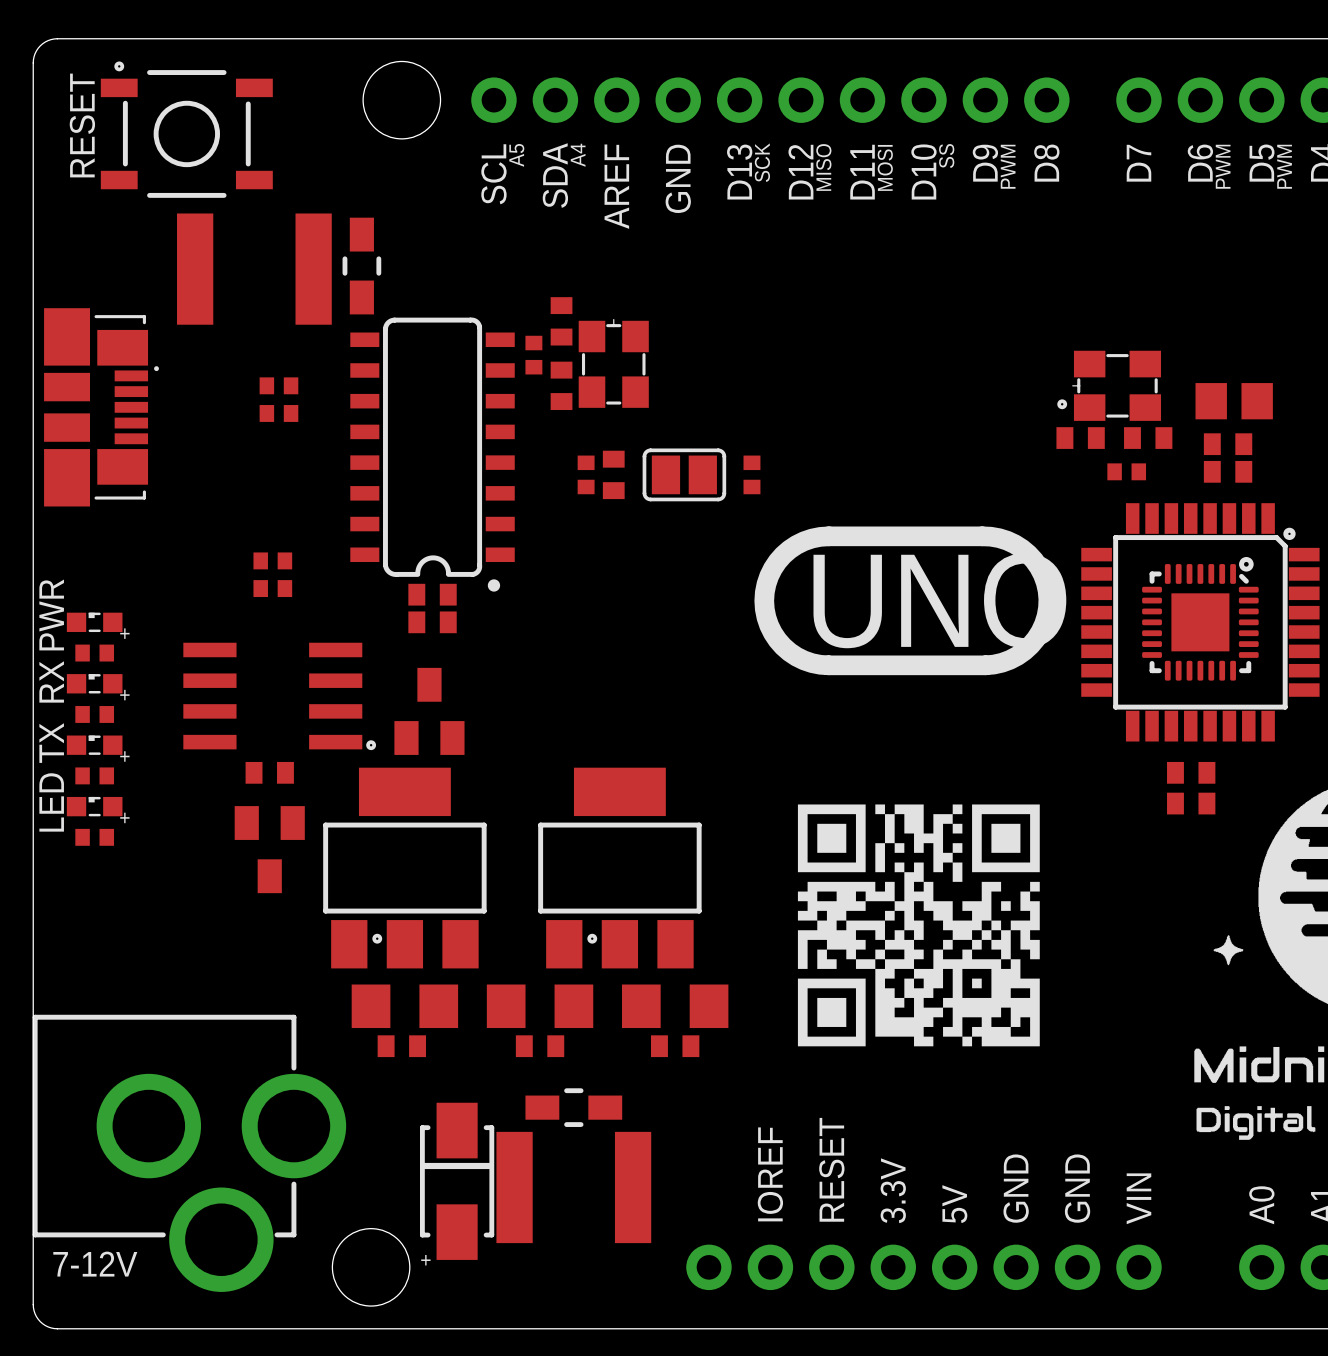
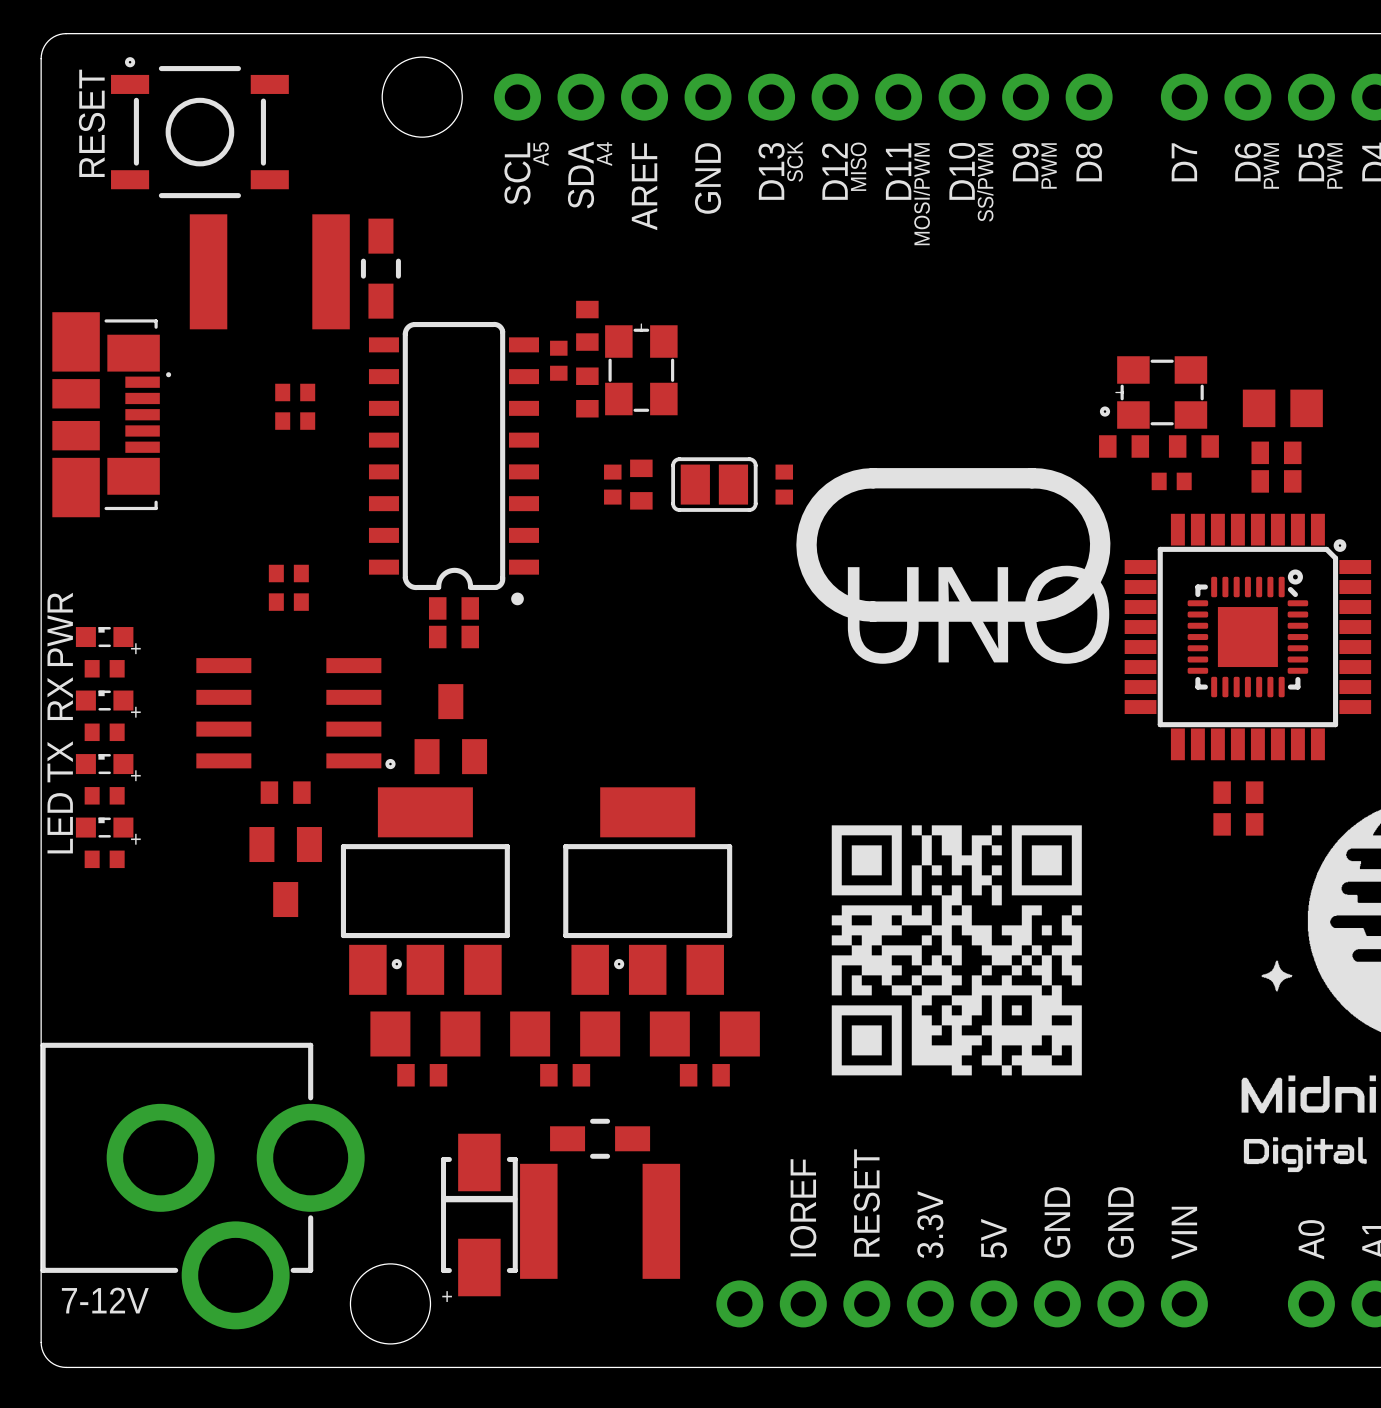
text: SS (946, 156) -> SS/PWM (985, 182)
text: MOSI (885, 167) -> MOSI/PWM (921, 194)
line: (828, 536) (982, 536) (1007, 540) (1028, 554) (1042, 574) (1048, 599) (1044, 624) (1035, 638) (1024, 651) (1009, 659) (993, 664) (828, 665) (804, 660) (783, 646) (772, 633) (764, 609) (764, 592) (769, 576) (783, 555) (804, 541) (828, 536) -> (873, 478) (1031, 478) (1057, 482) (1079, 496) (1094, 517) (1100, 543) (1095, 568) (1087, 584) (1075, 596) (1060, 605) (1043, 610) (873, 611) (847, 606) (826, 592) (815, 578) (807, 553) (807, 536) (811, 519) (826, 497) (847, 483) (873, 478)

